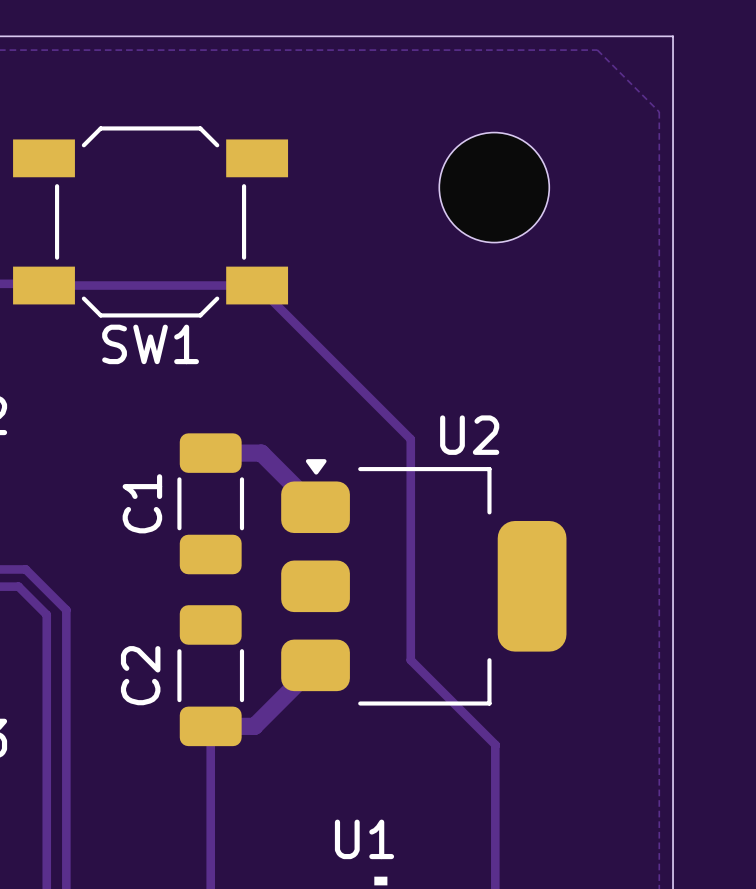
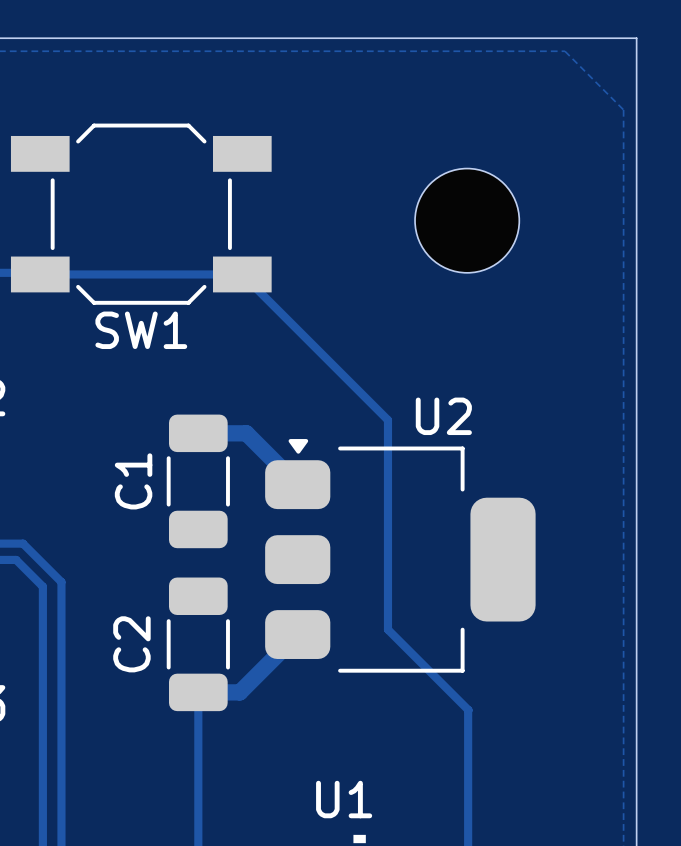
part position: (494, 187) -> (467, 220)

